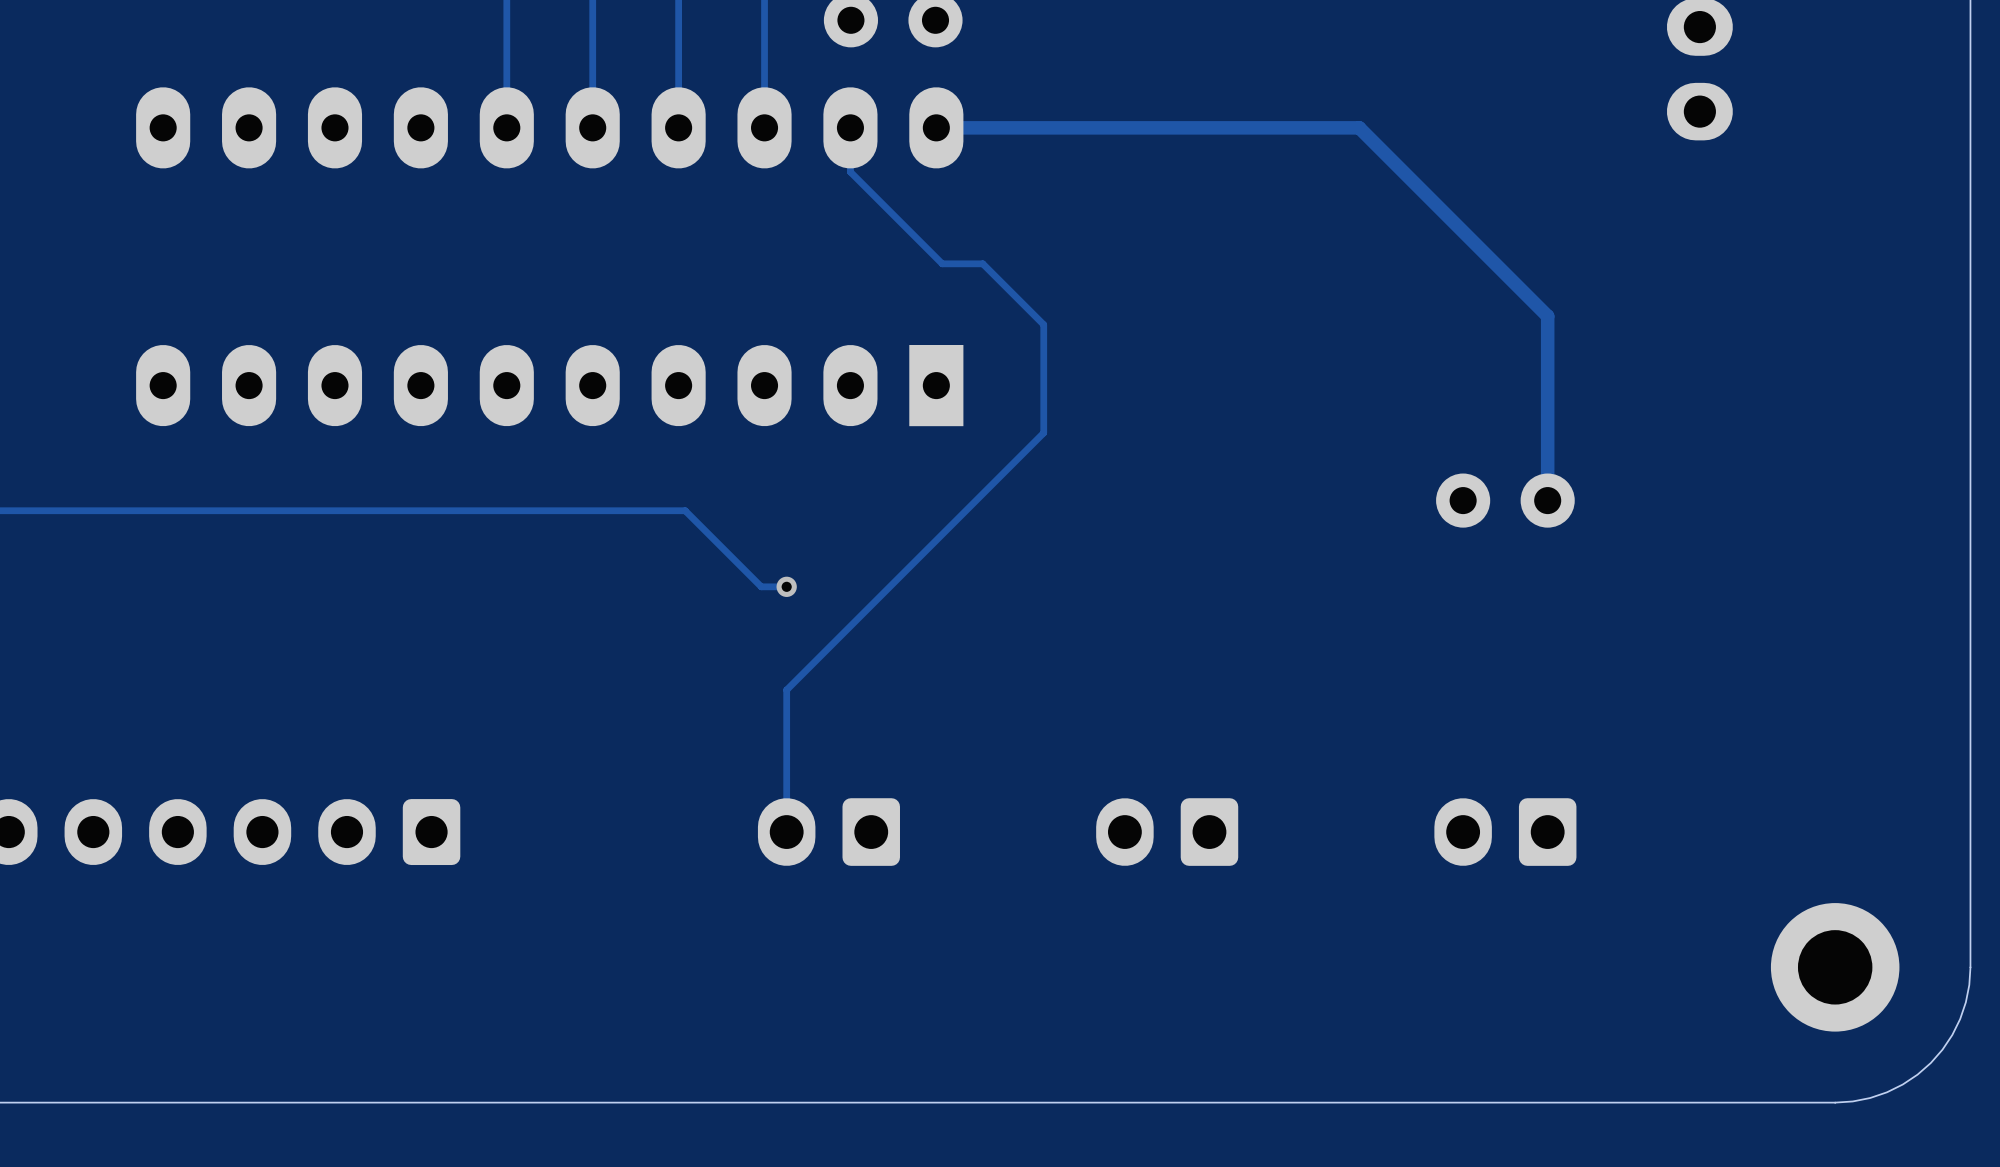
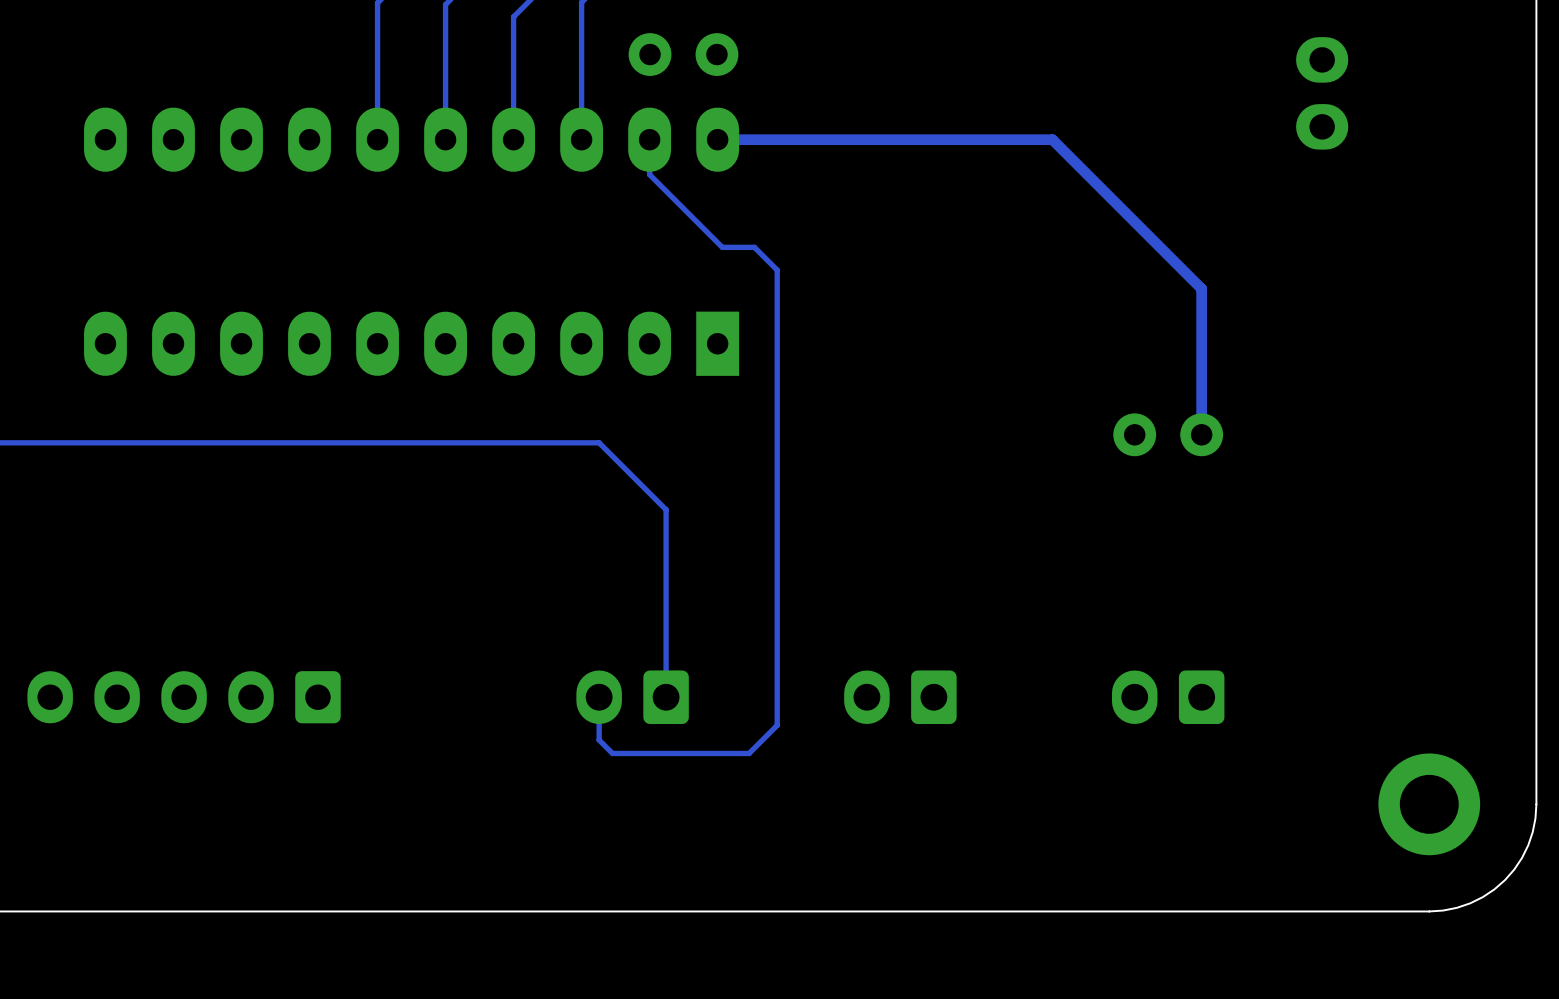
track: (1011, 292) (1043, 324) (1043, 432) (786, 689) (786, 832) -> (777, 270) (777, 725) (749, 753) (612, 753) (599, 740) (599, 697)
track: (685, 510) (761, 586) (786, 586) -> (518, 442) (599, 442) (666, 509) (666, 697)
via: (786, 586) -> none

